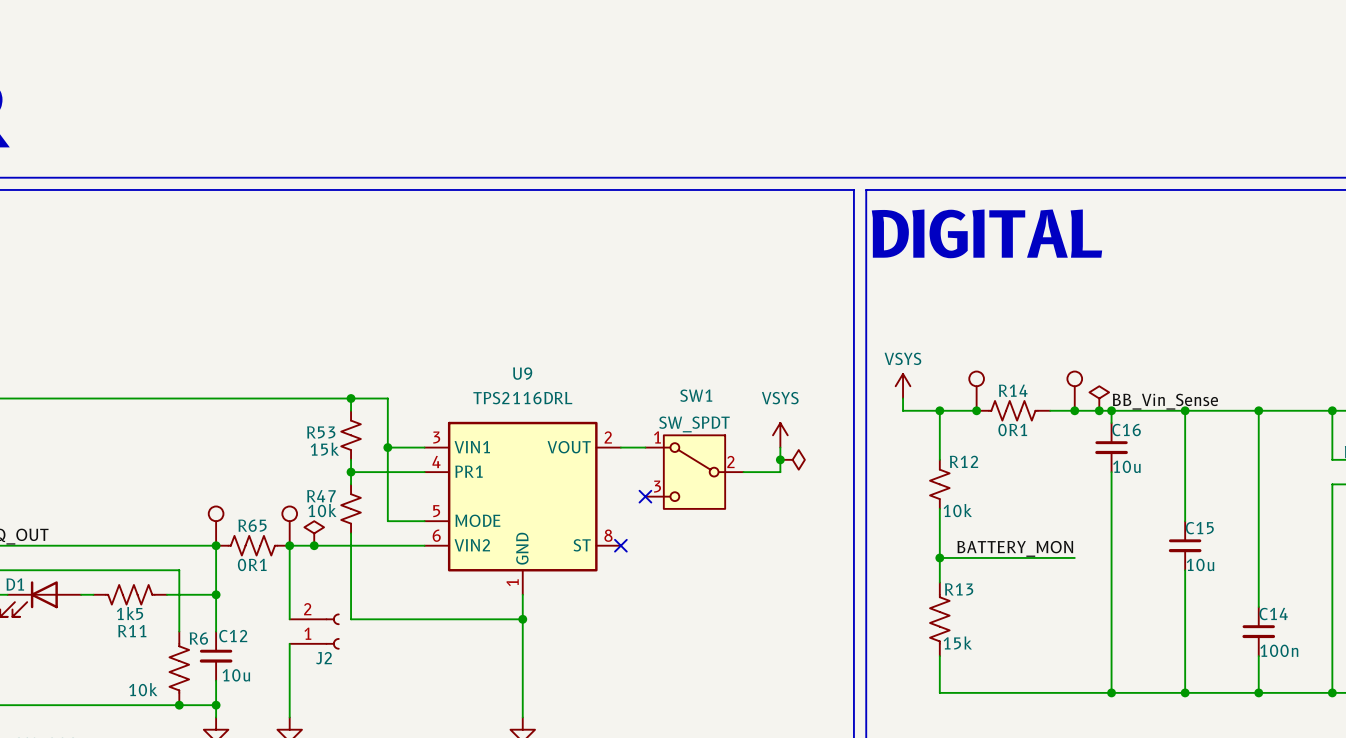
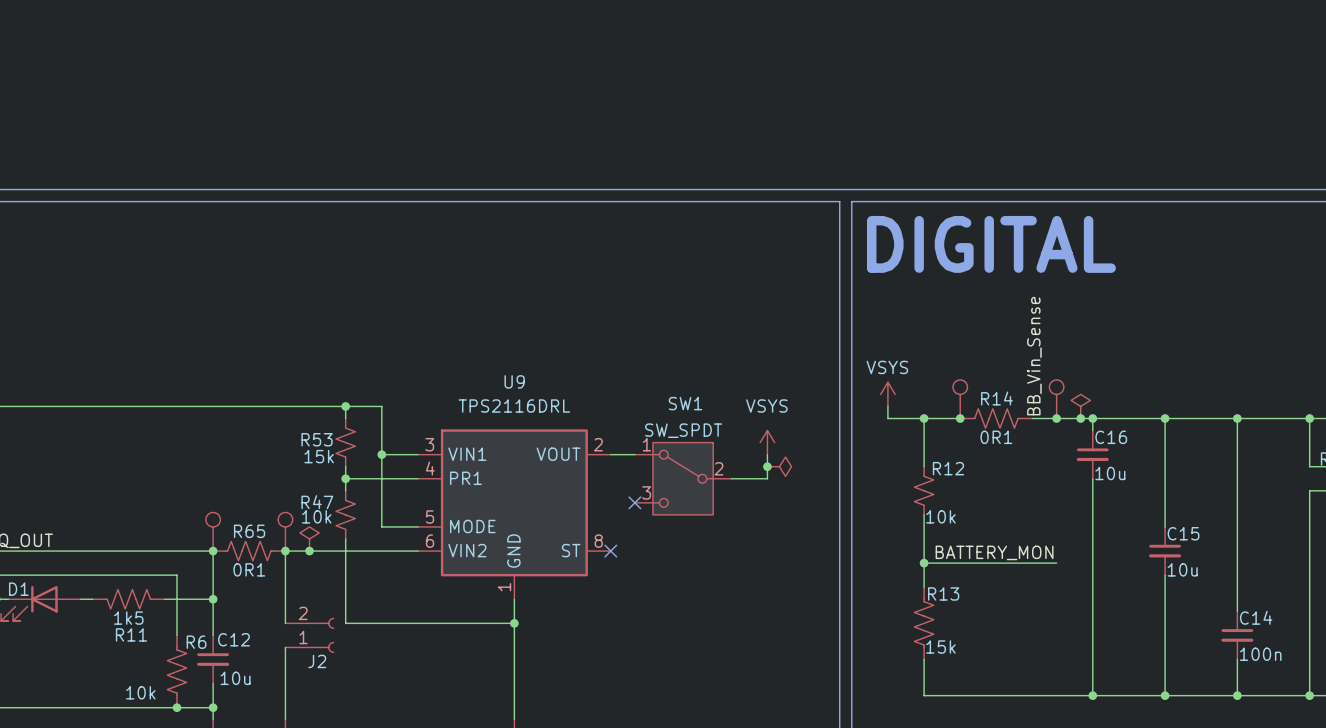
label rotation: 0° (1165, 401) -> 90° counterclockwise (1034, 356)
label position: BB_Vin_Sense (1165, 401) -> BB_Vin_Sense (1034, 356)

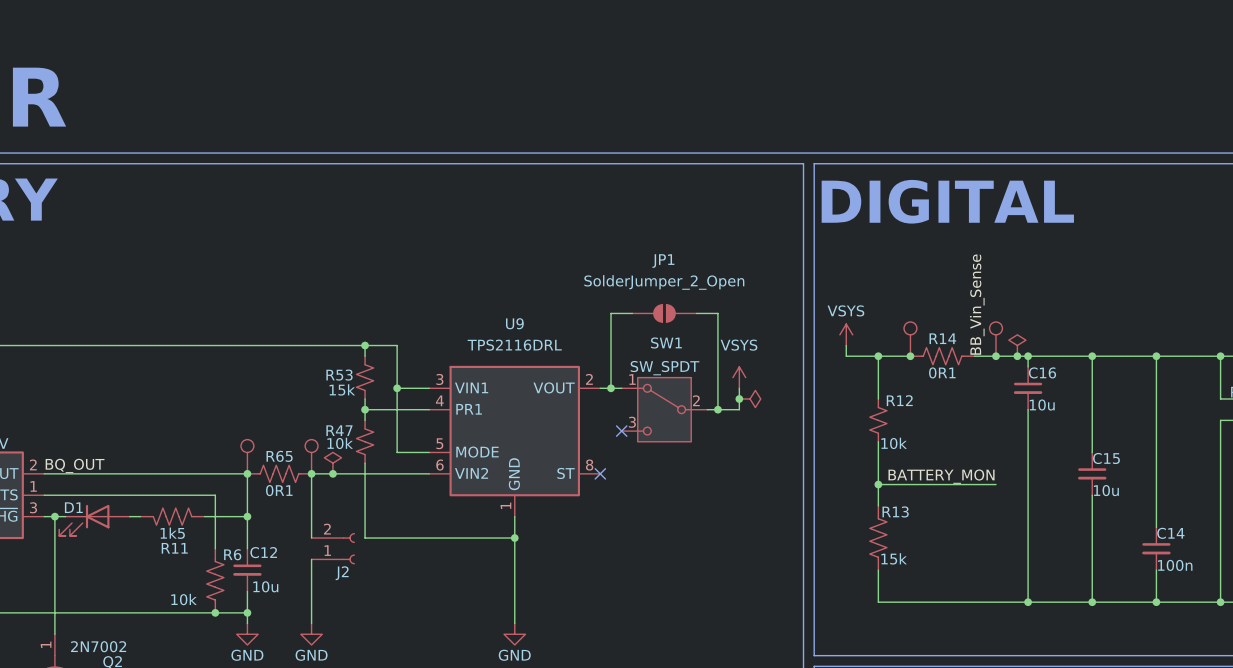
wire: none -> (632, 313) (611, 313) (611, 388)
JP1: none -> SolderJumper_2_Open (664, 313)
wire: none -> (696, 313) (717, 313) (717, 409)
junction: none -> (611, 388)
junction: none -> (717, 409)

